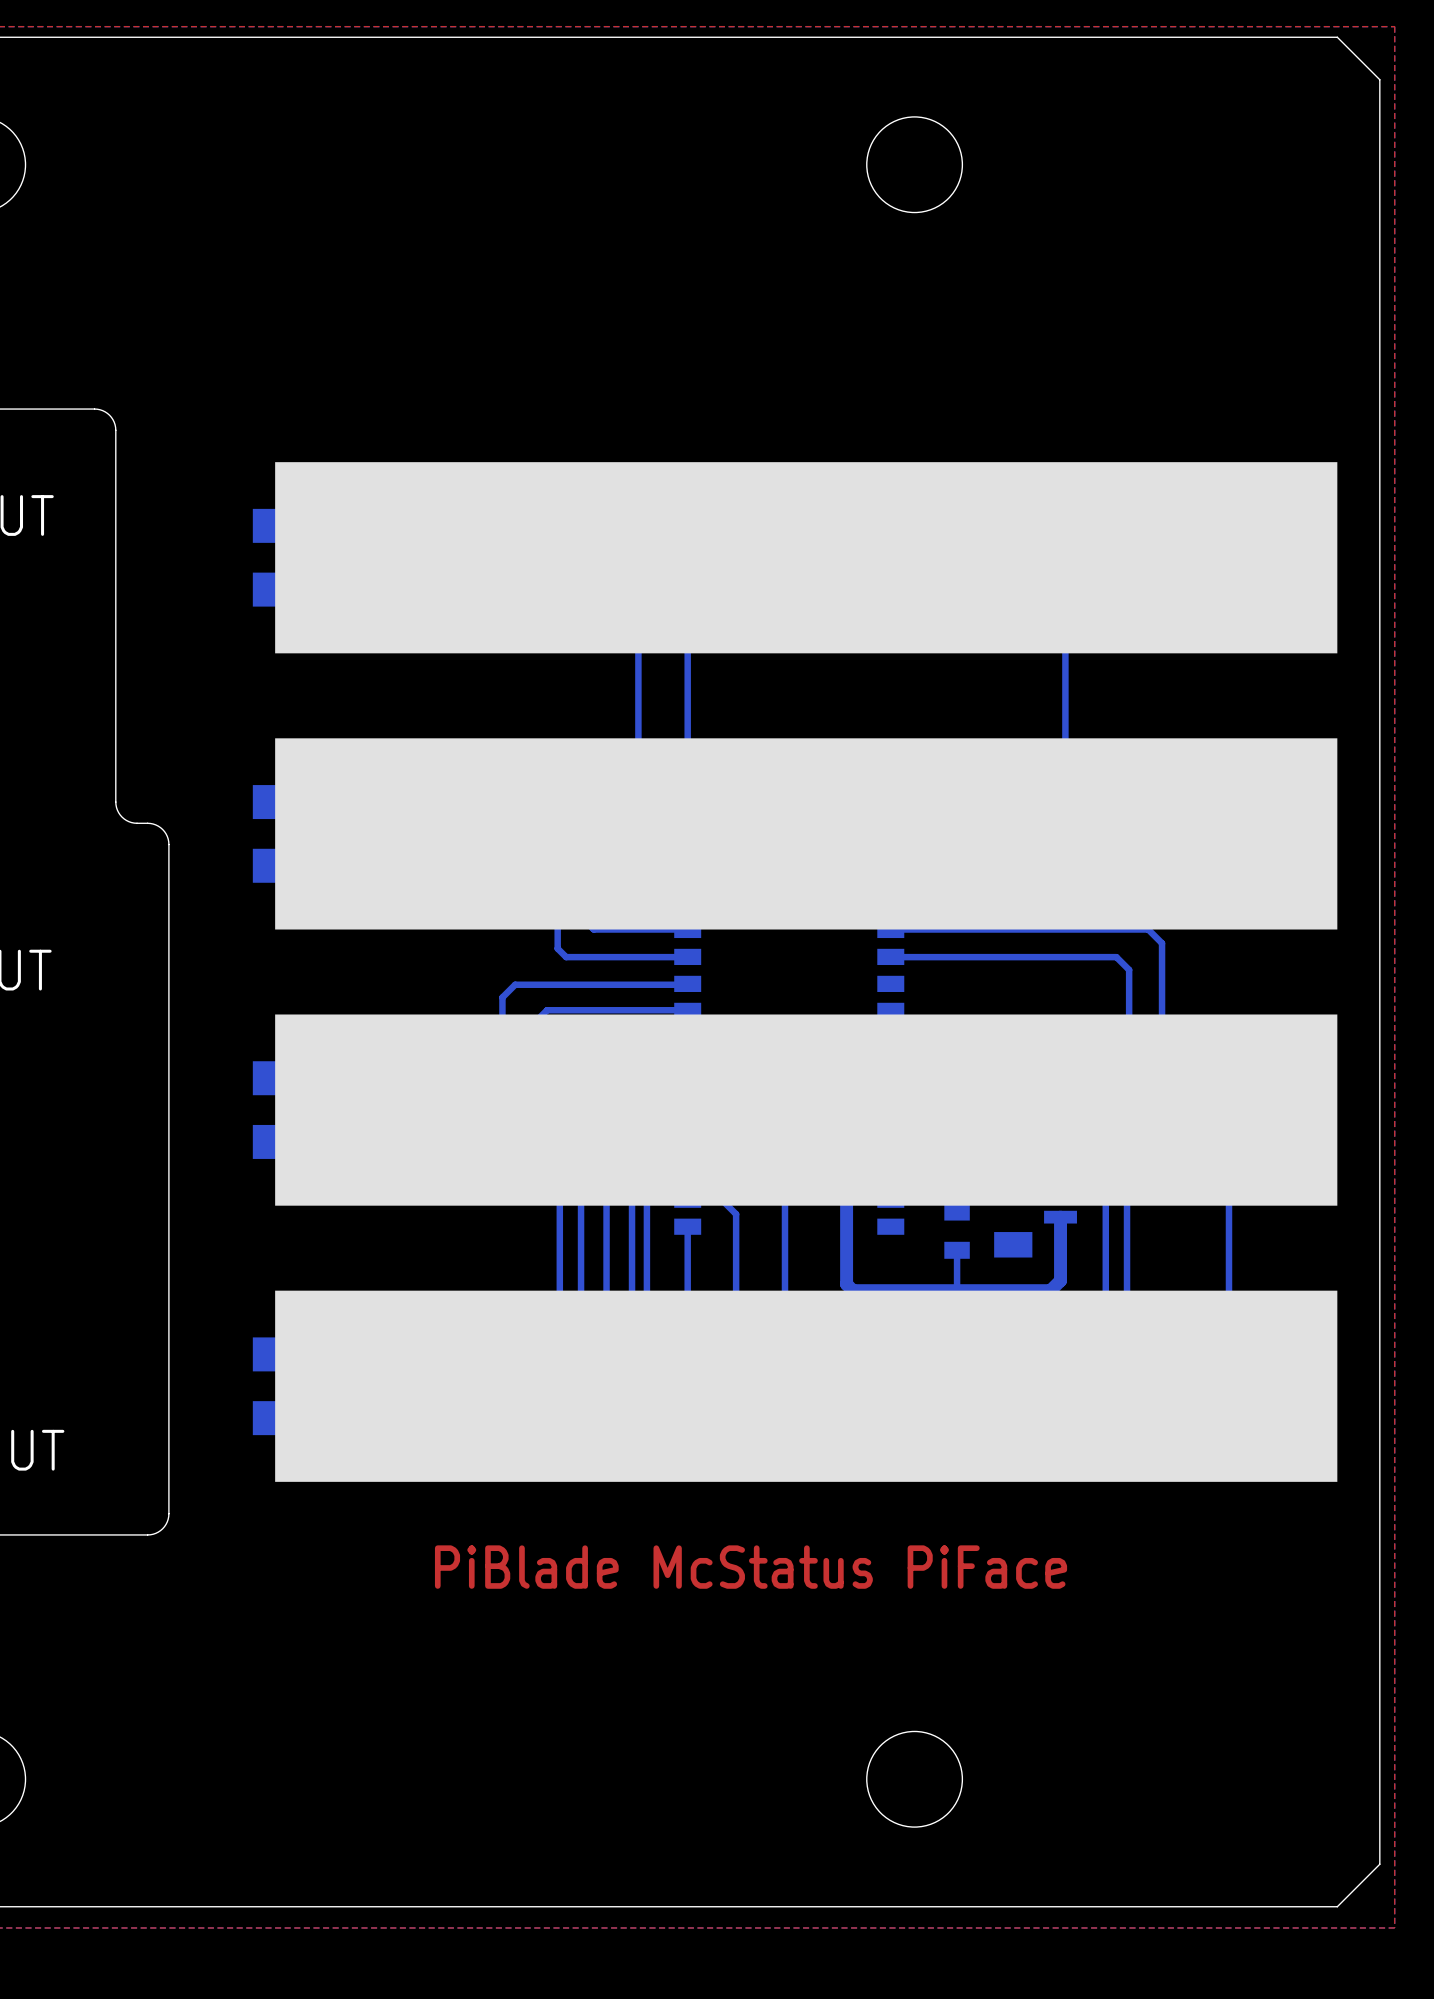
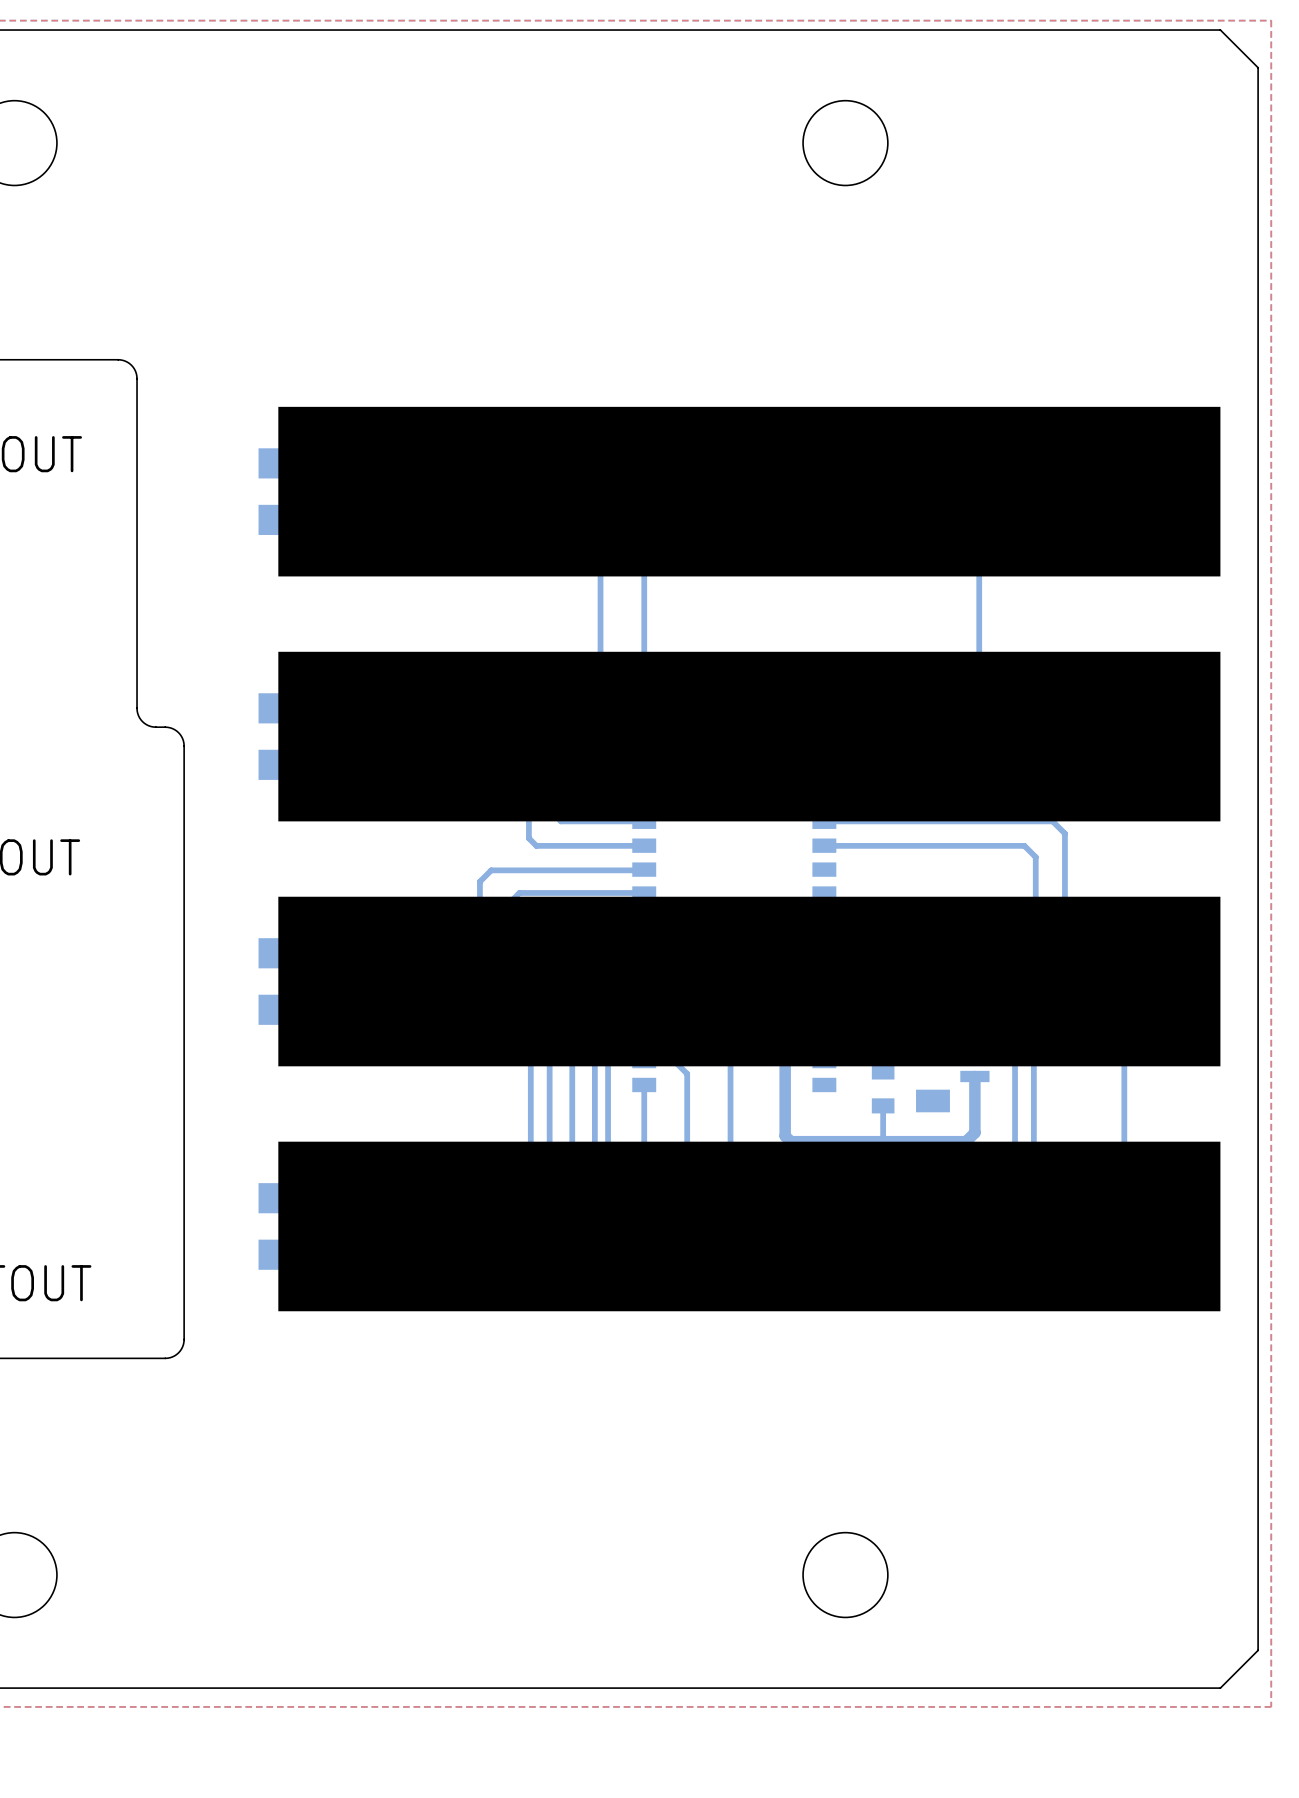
text: PiBlade McStatus PiFace (751, 1567) -> none

